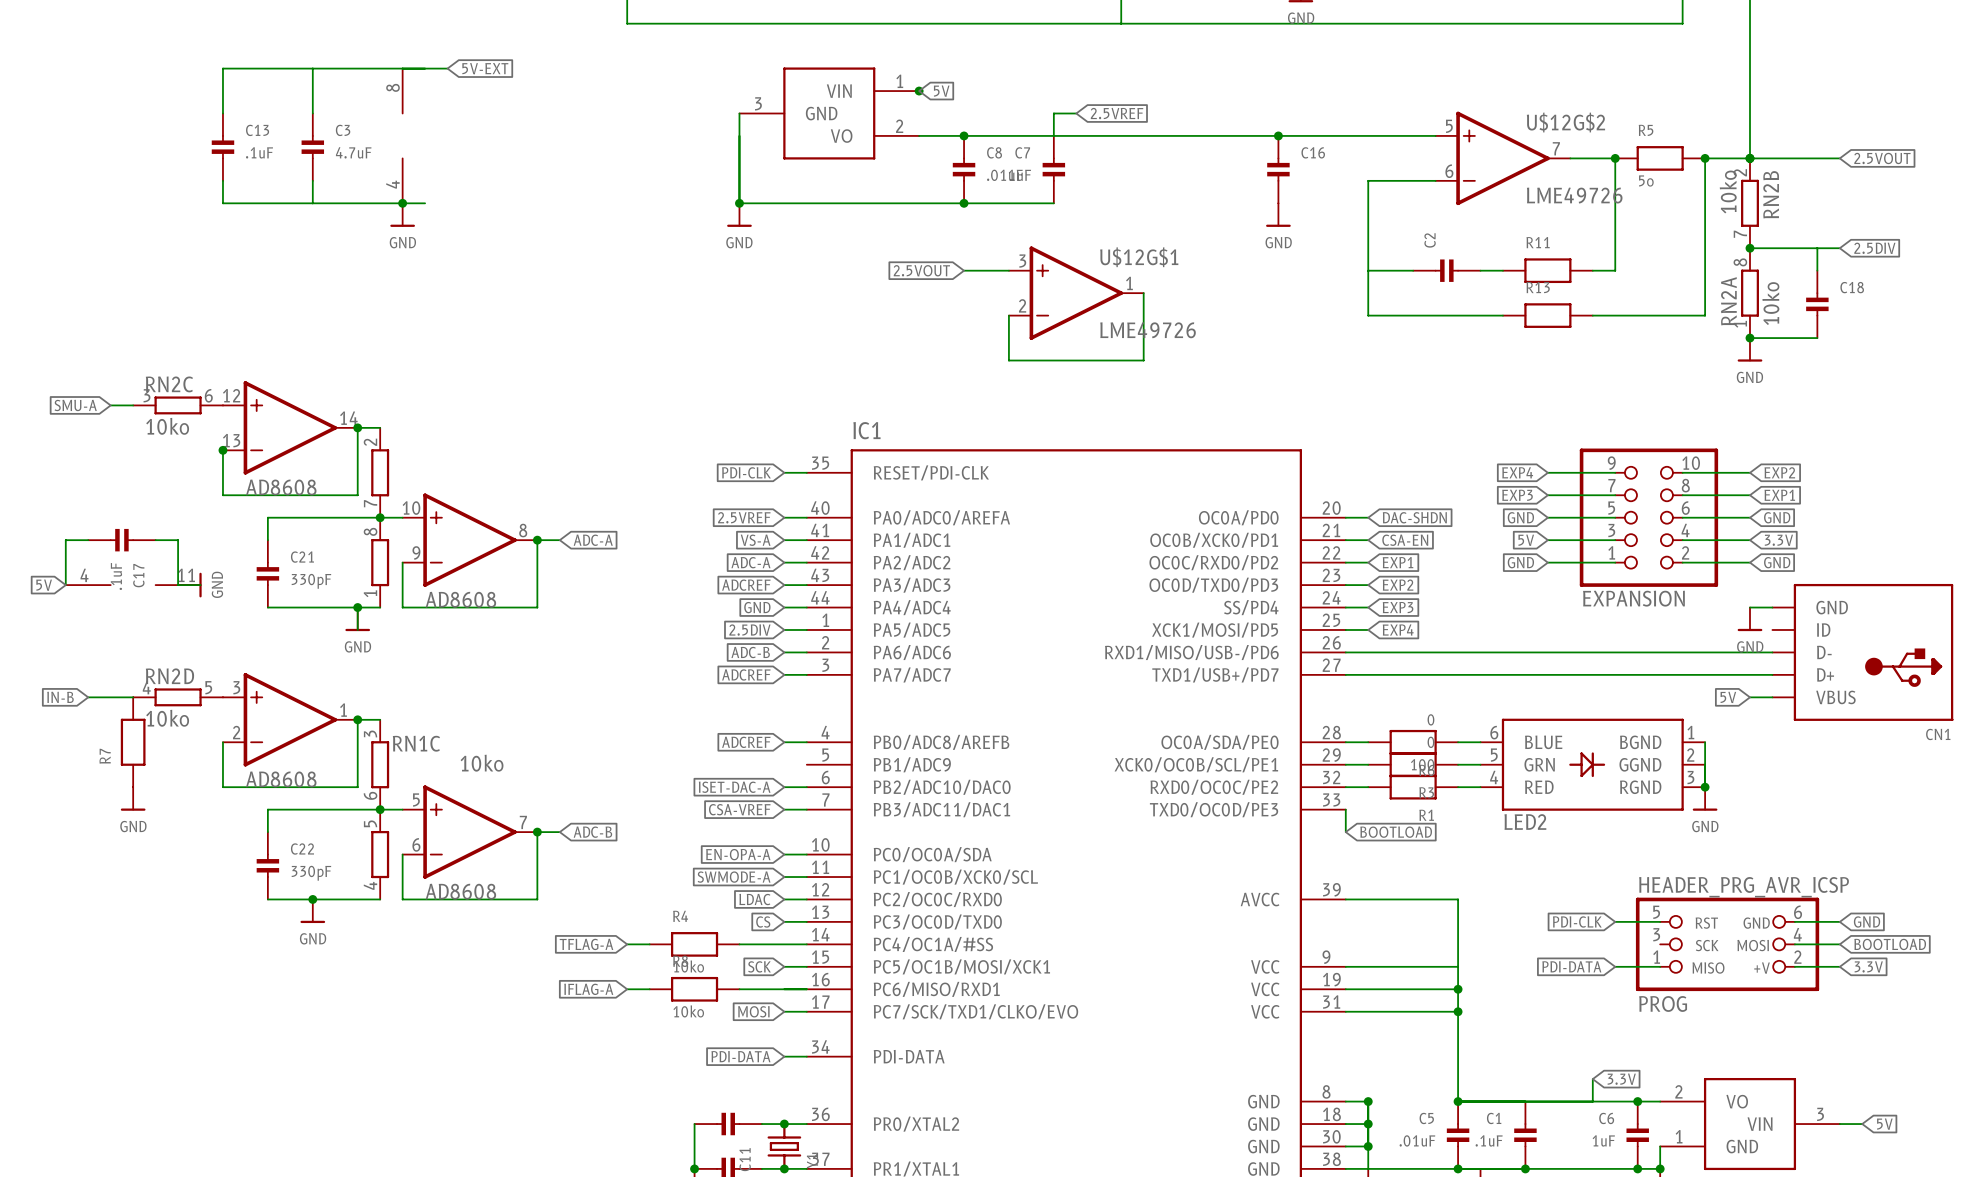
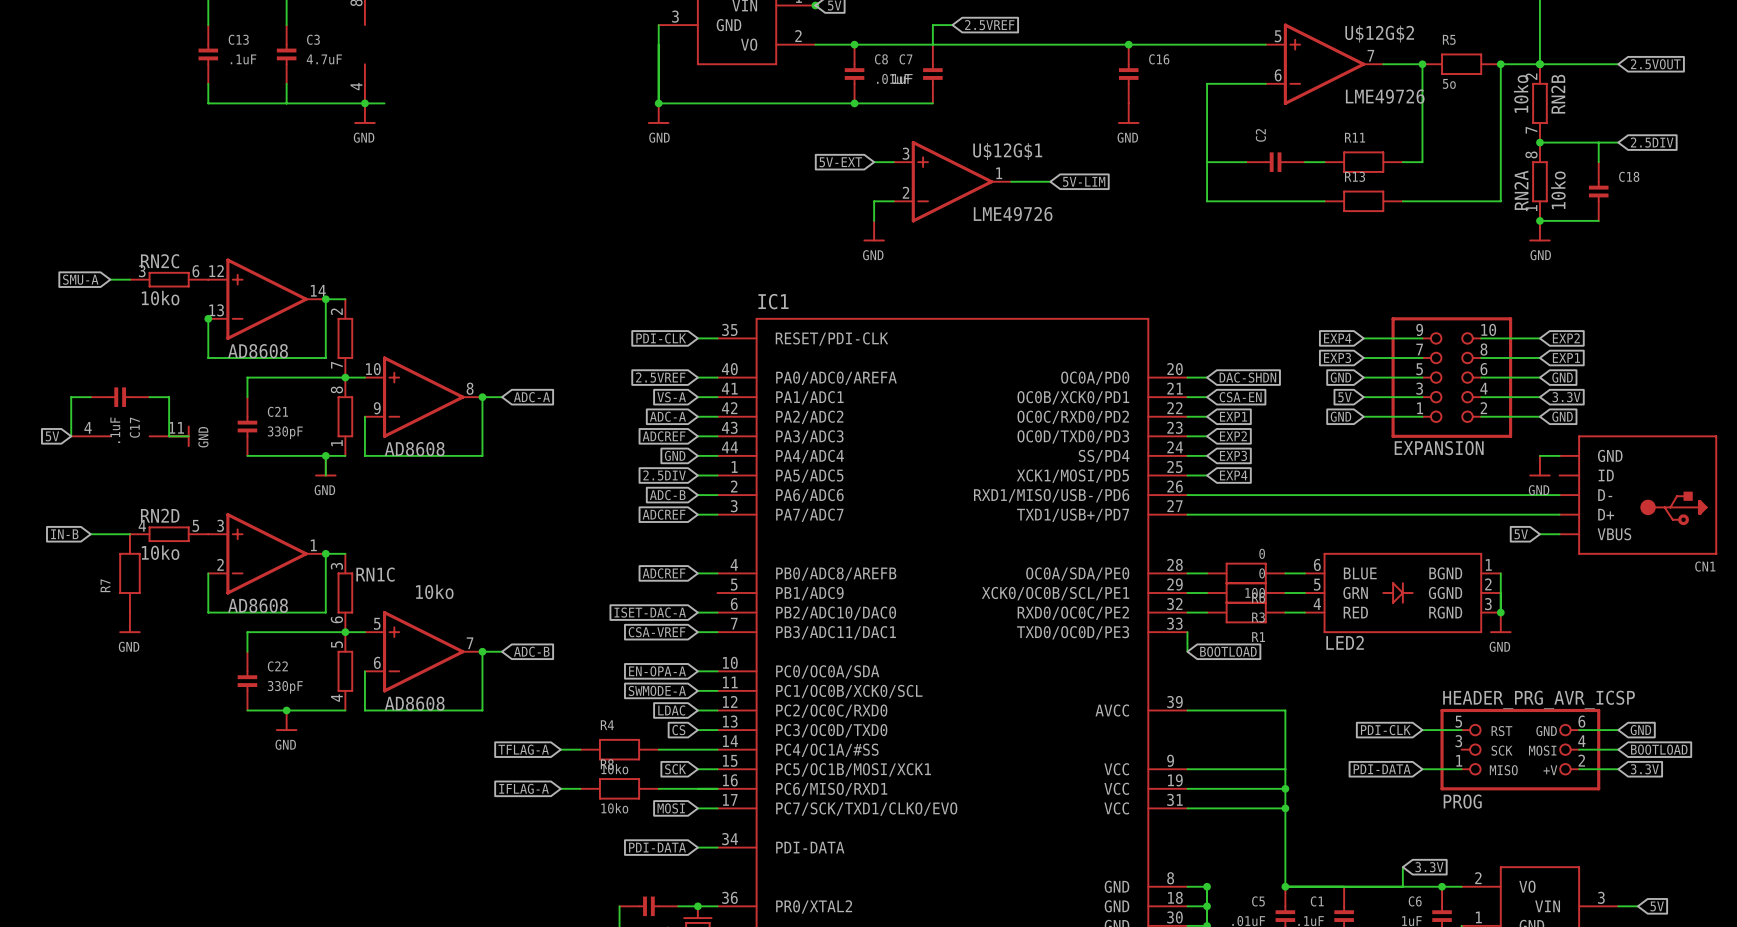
global label: 2.5VOUT (921, 270) -> none
global label: none -> 5V-EXT (840, 162)
wire: (964, 270) (986, 270) -> none
wire: (1143, 293) (1143, 360) (1008, 360) (1008, 315) -> (874, 220) (874, 201) (893, 201)
wire: none -> (1011, 181) (1050, 181)
global label: none -> 5V-LIM (1084, 181)
power symbol: none -> GND (874, 231)

